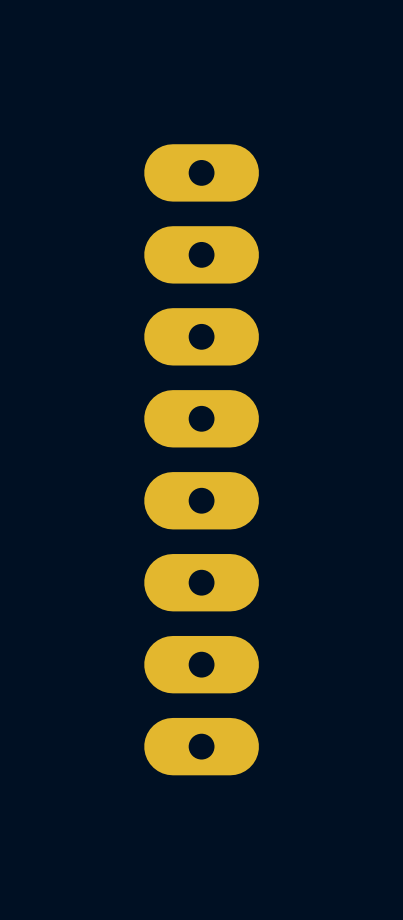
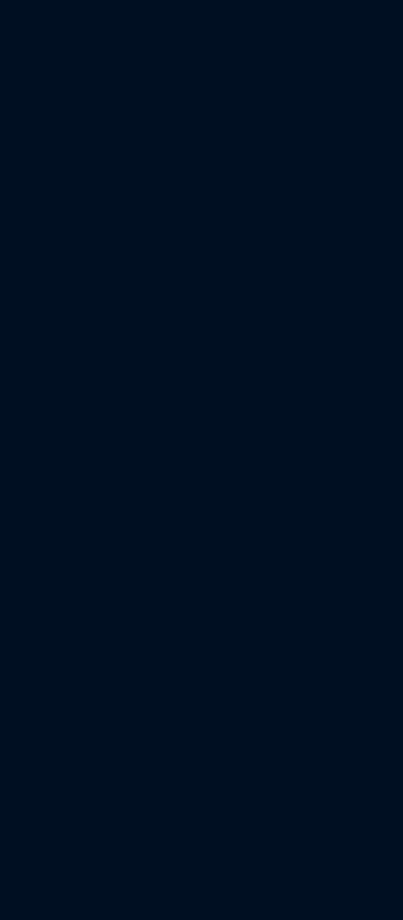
part: (201, 459) -> none

